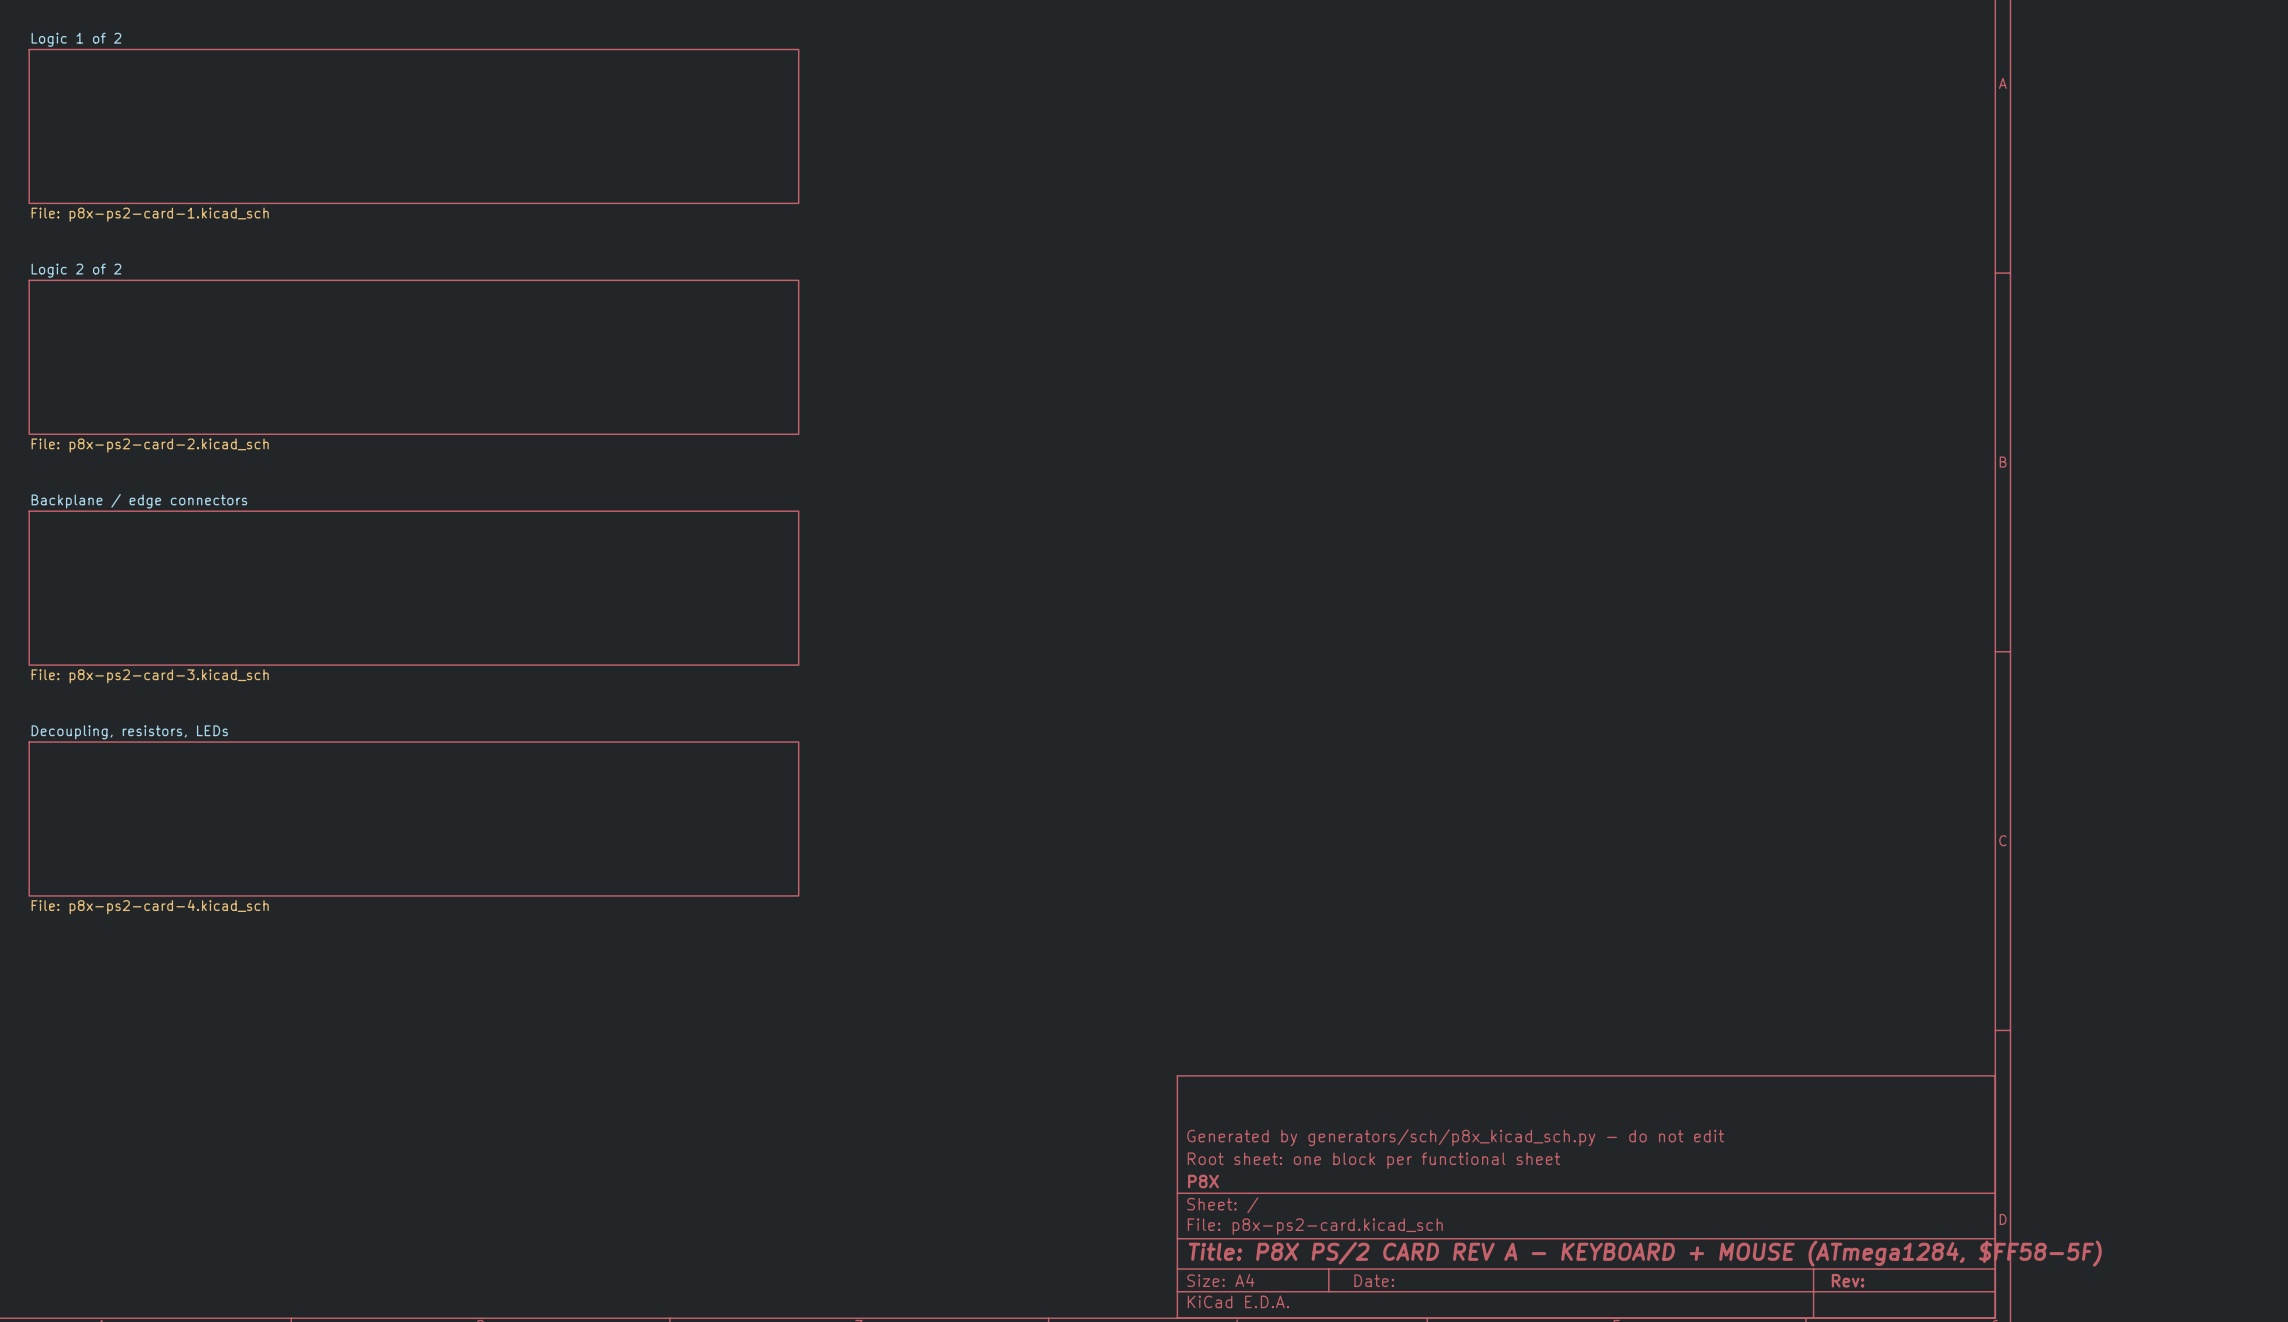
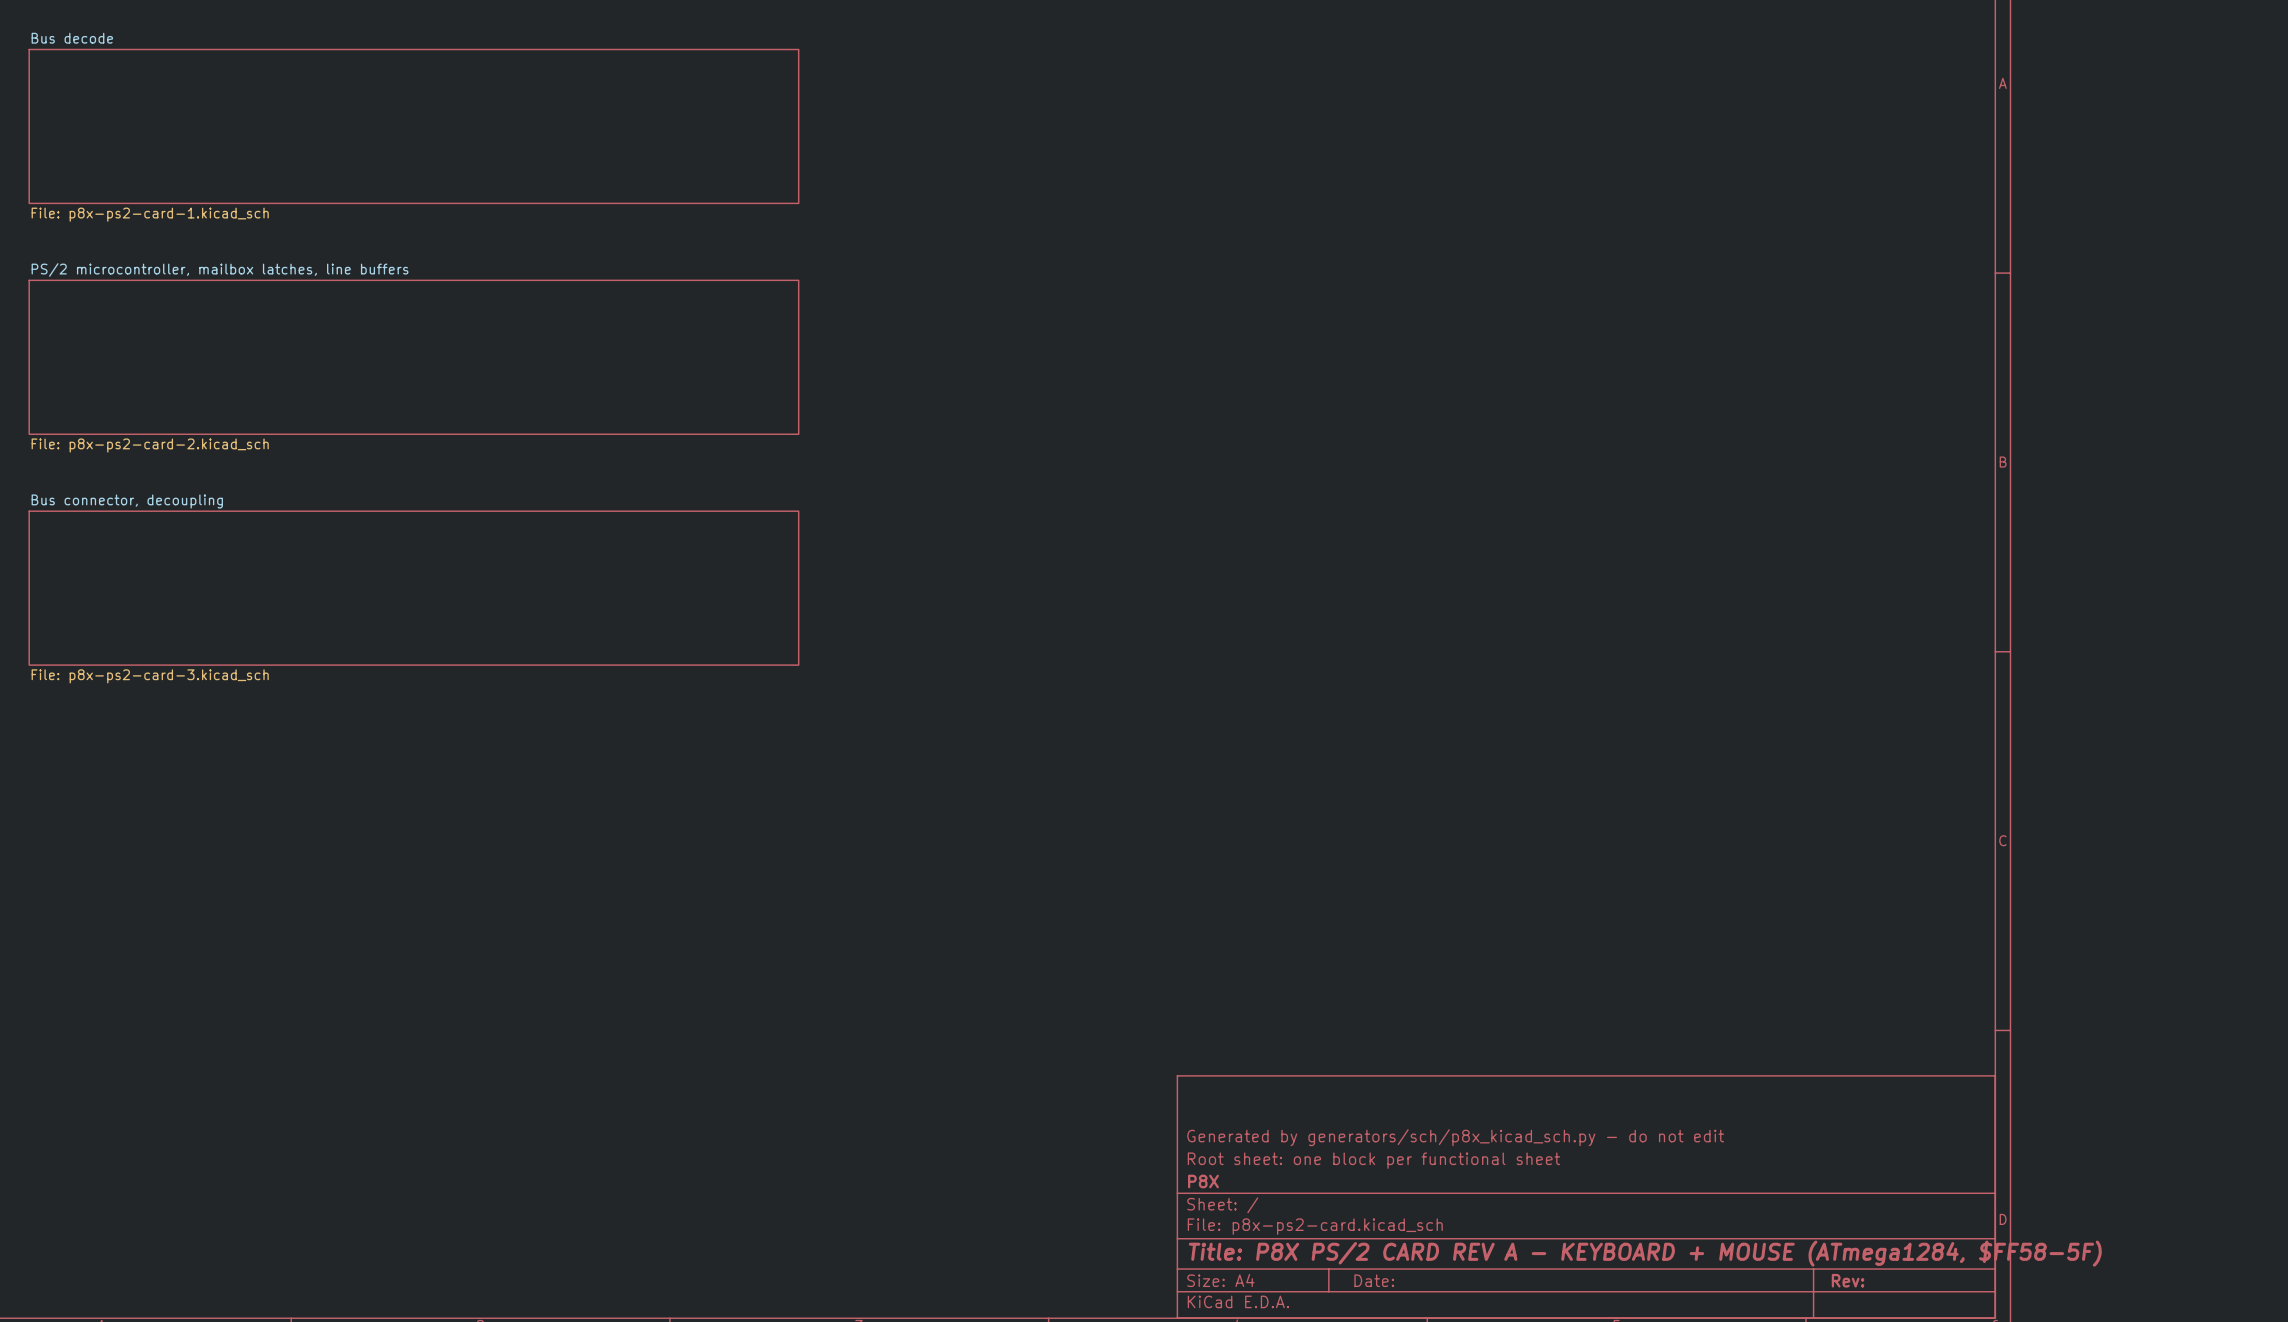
sheet Logic 1 of 2 name: Logic 1 of 2 (76, 39) -> Bus decode (72, 38)
sheet Logic 2 of 2 name: Logic 2 of 2 (76, 270) -> PS/2 microcontroller, mailbox latches, line buffers (220, 269)
sheet Backplane / edge connectors name: Backplane / edge connectors (139, 501) -> Bus connector, decoupling (127, 501)
sheet Decoupling, resistors, LEDs: File: p8x-ps2-card-4.kicad_sch (413, 818) -> none

